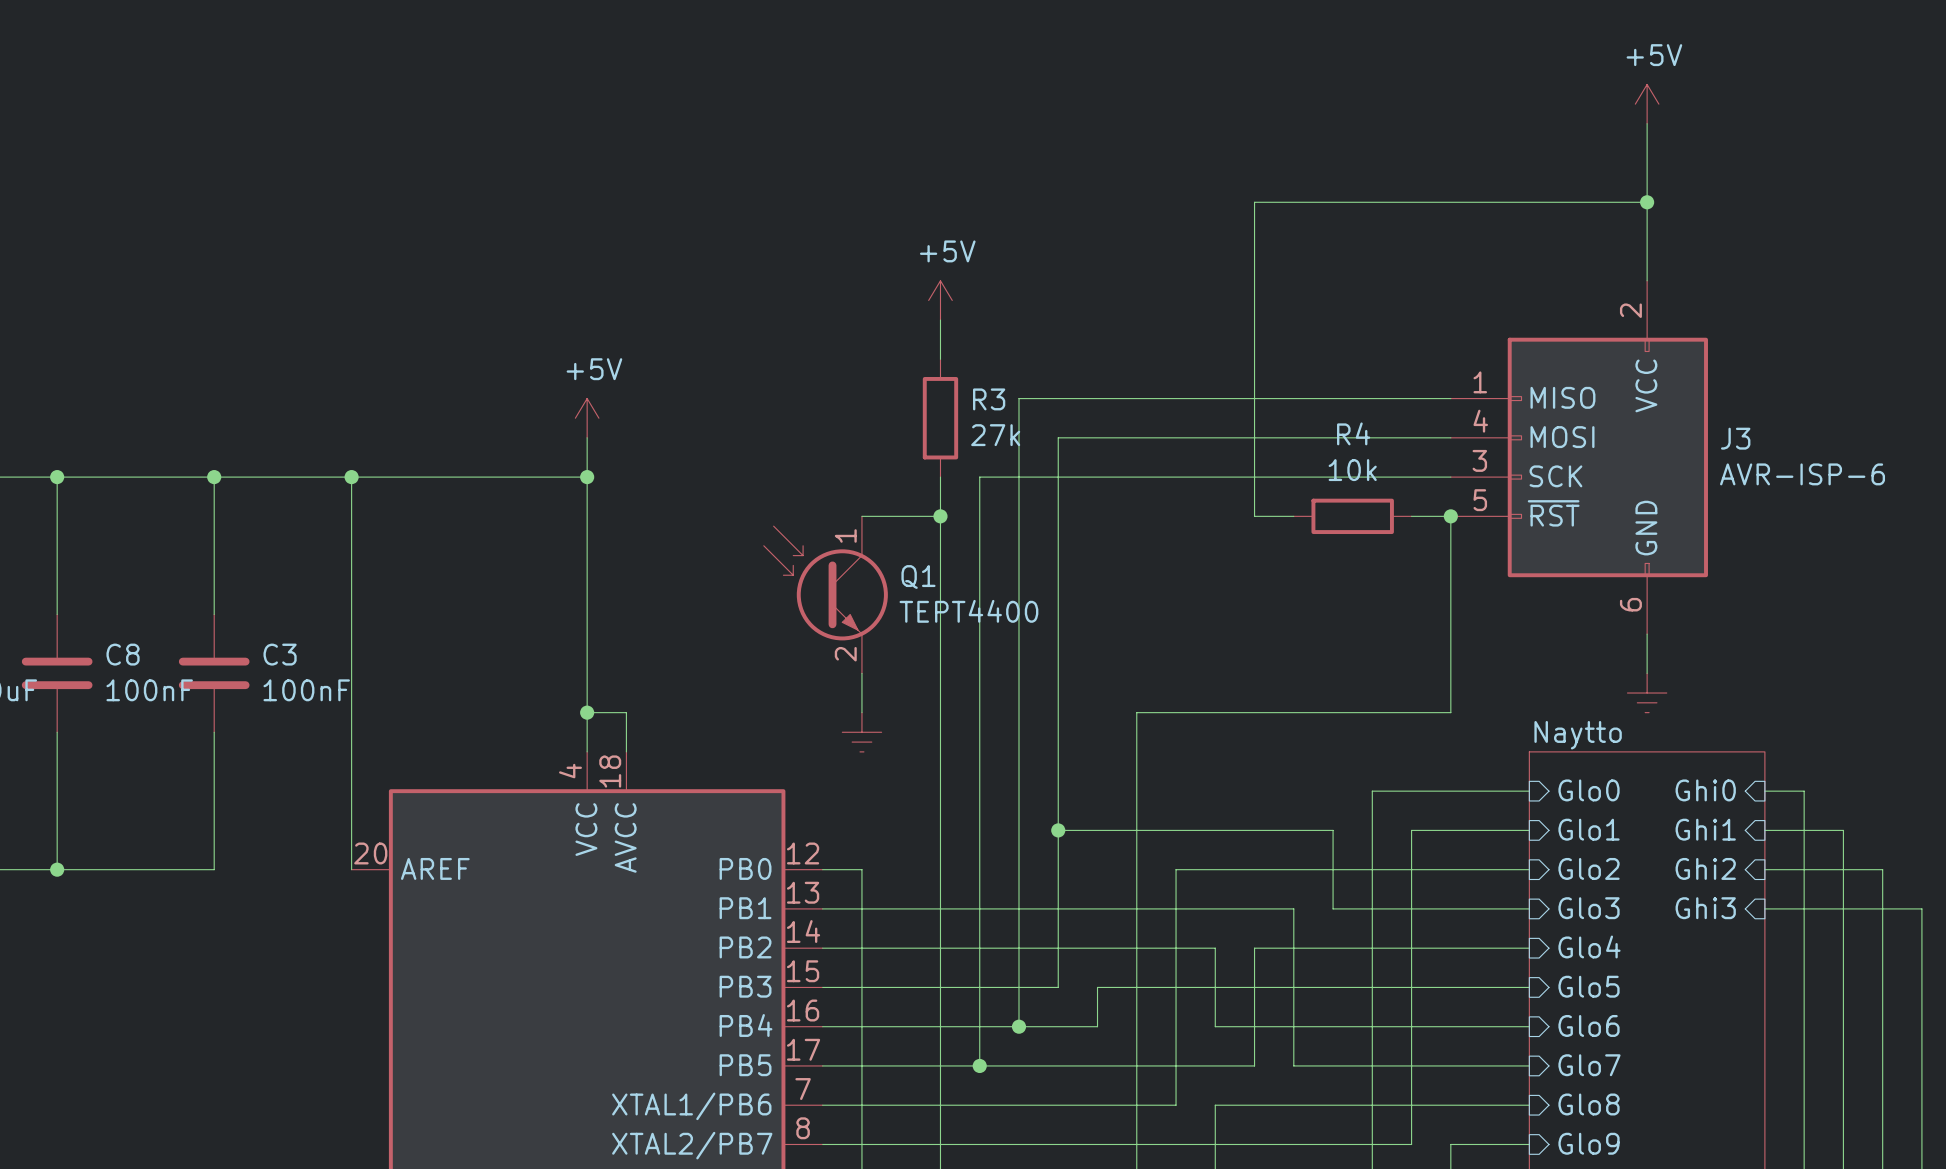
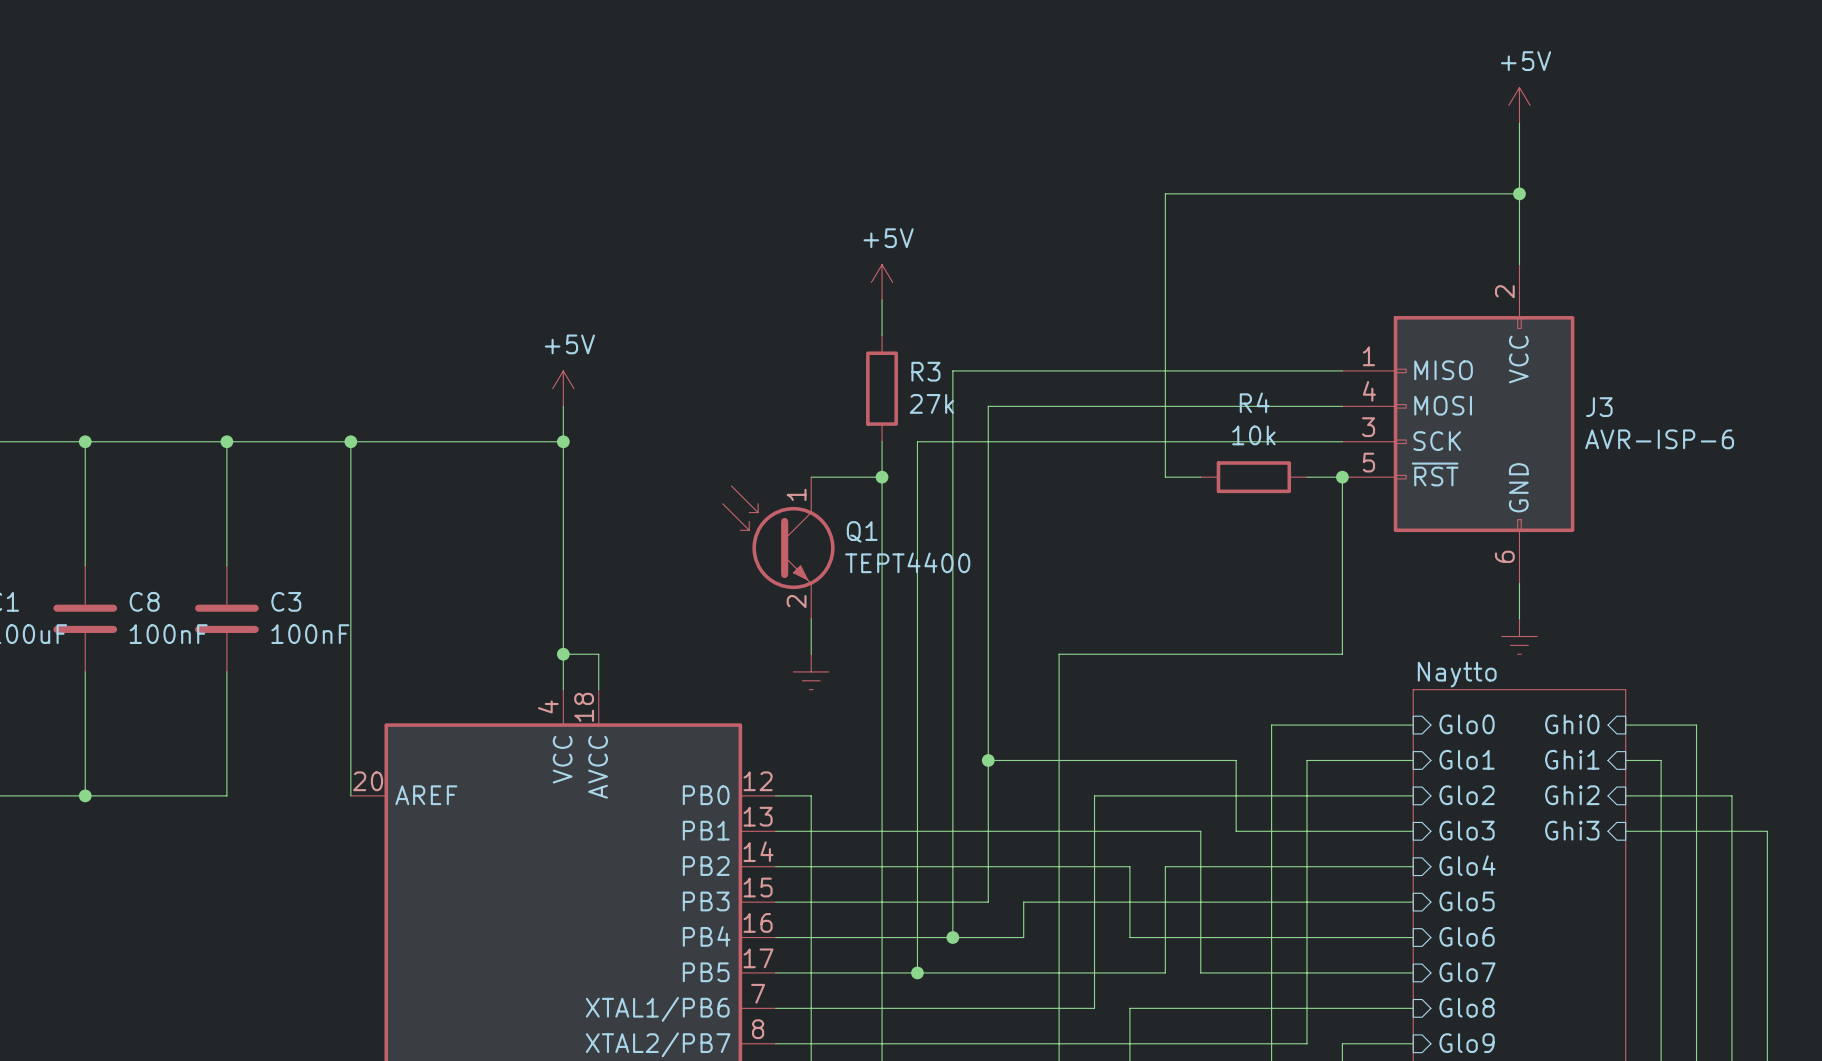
wire: (1804, 791) (1804, 830) (1843, 830) -> (1661, 725) (1696, 725) (1696, 760)

